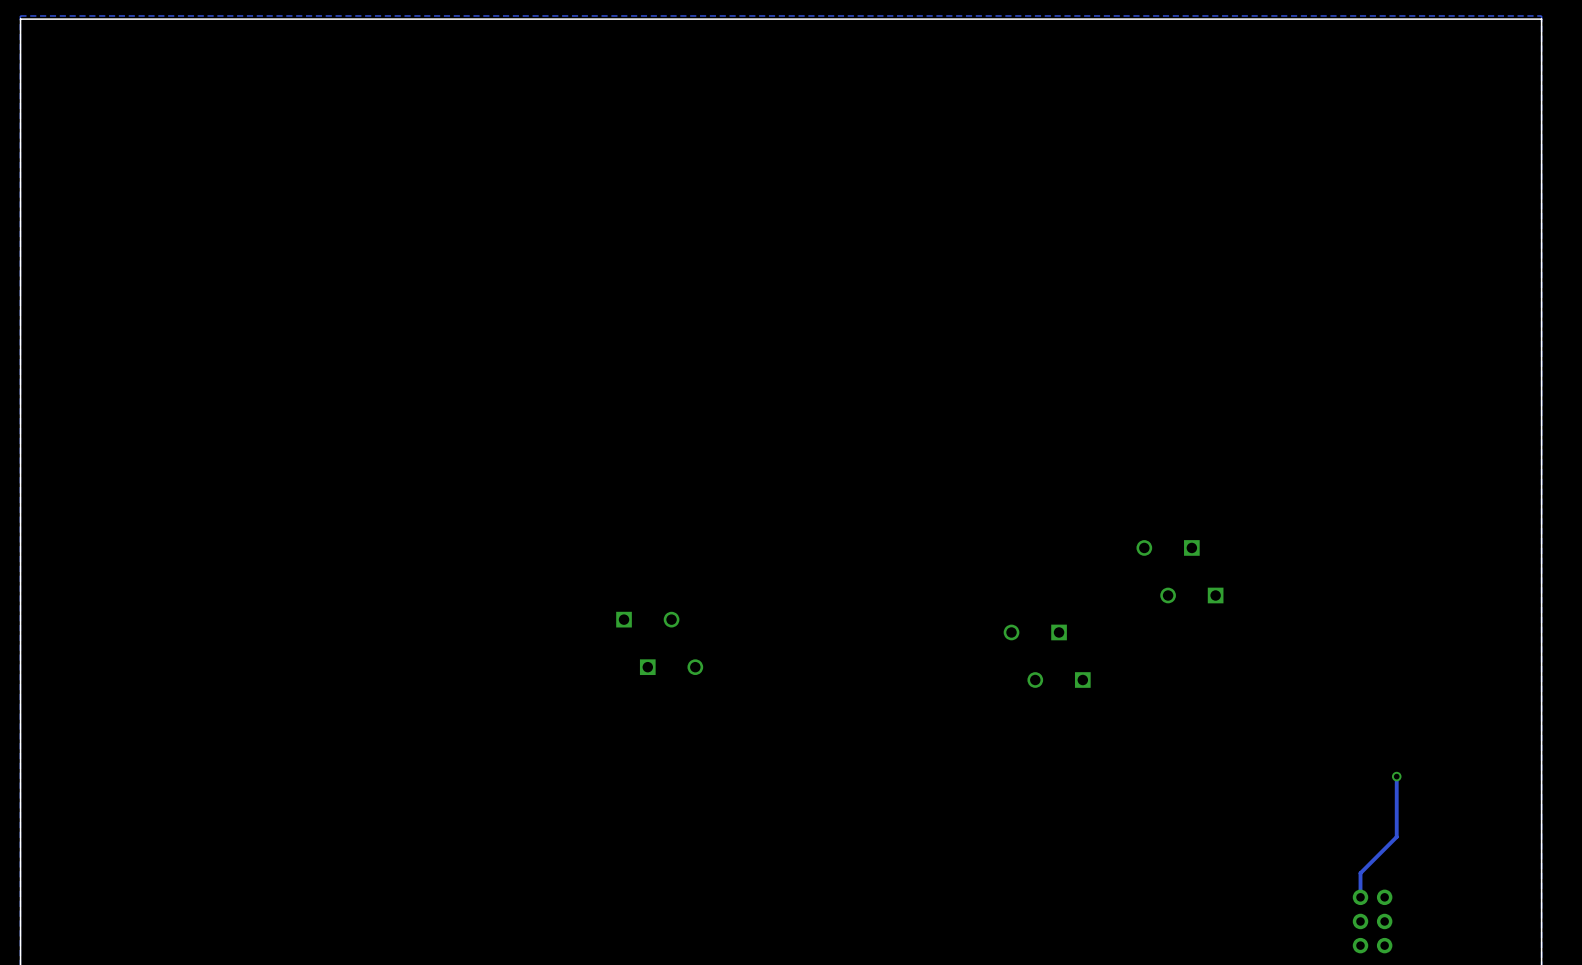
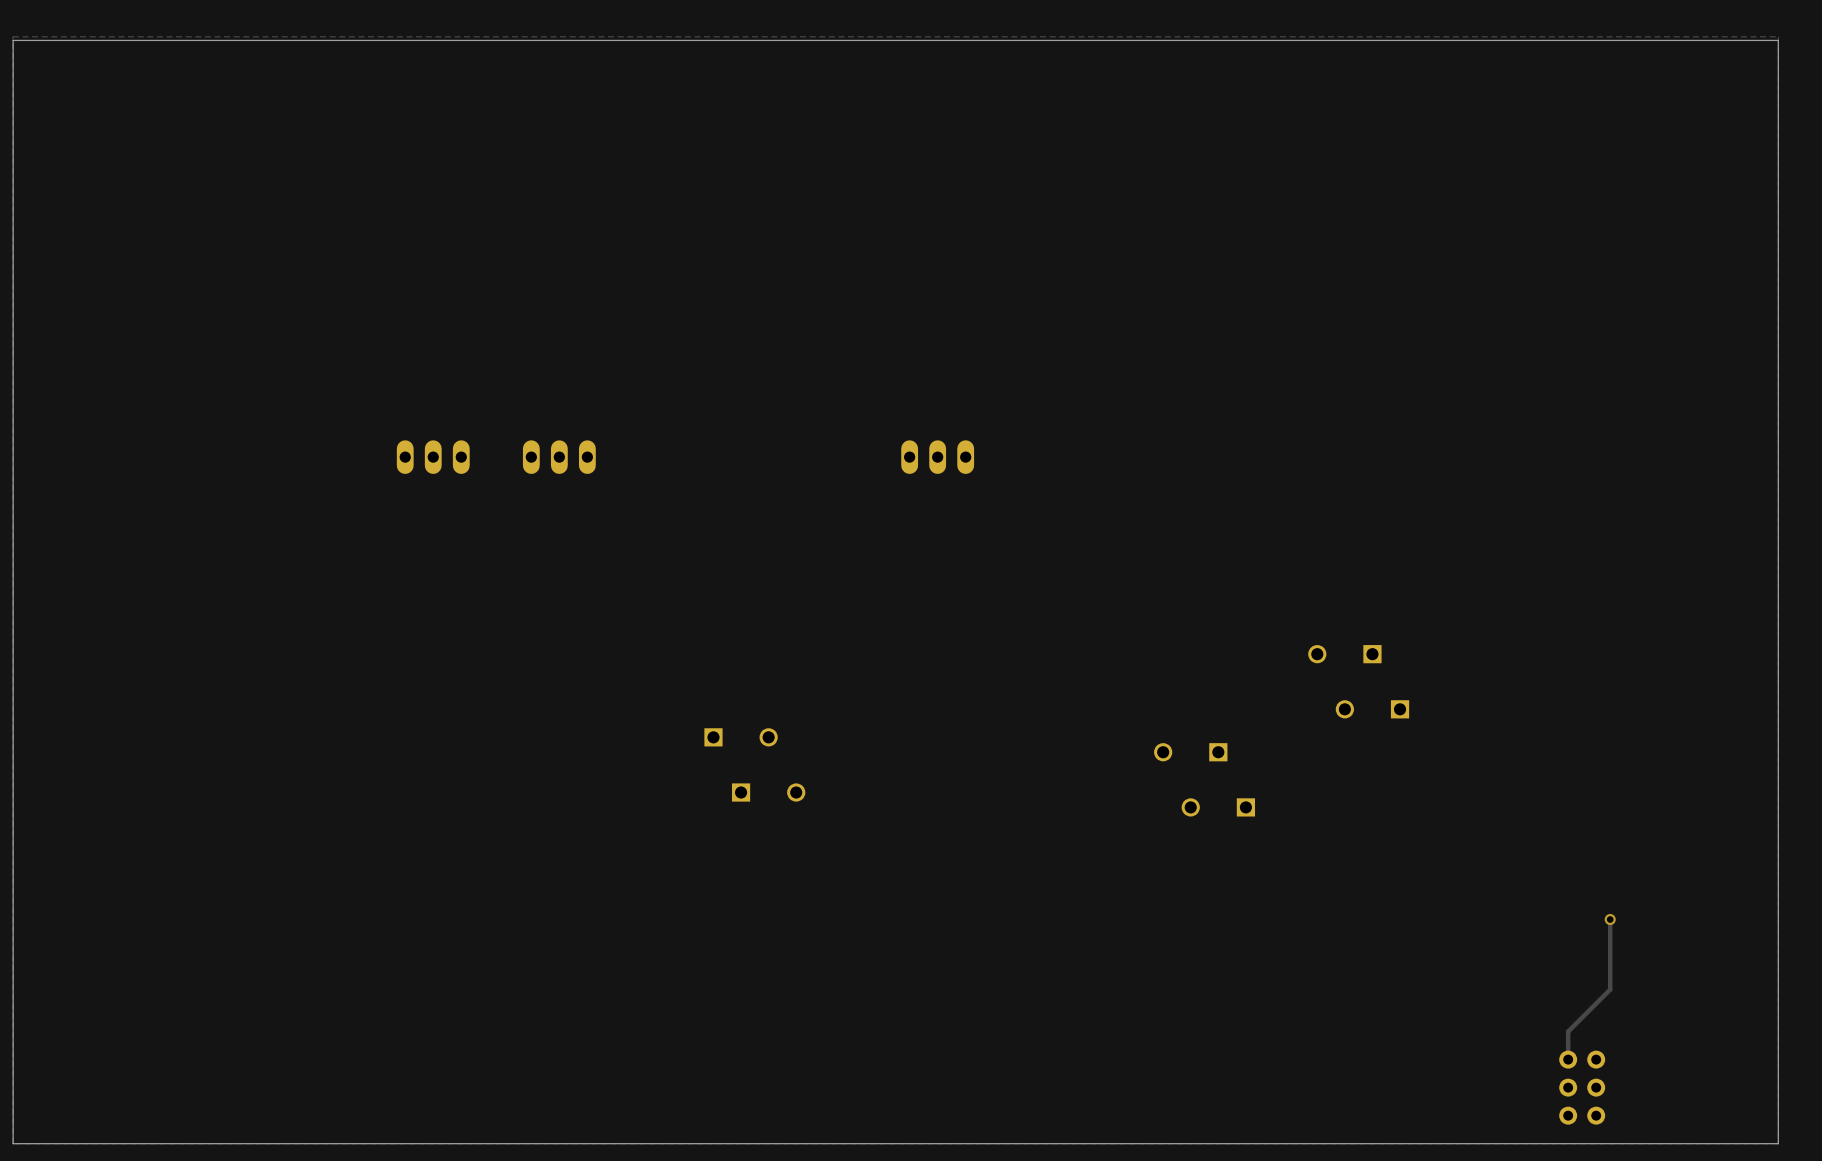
part: none -> (433, 457)
part: none -> (559, 457)
part: none -> (937, 457)

